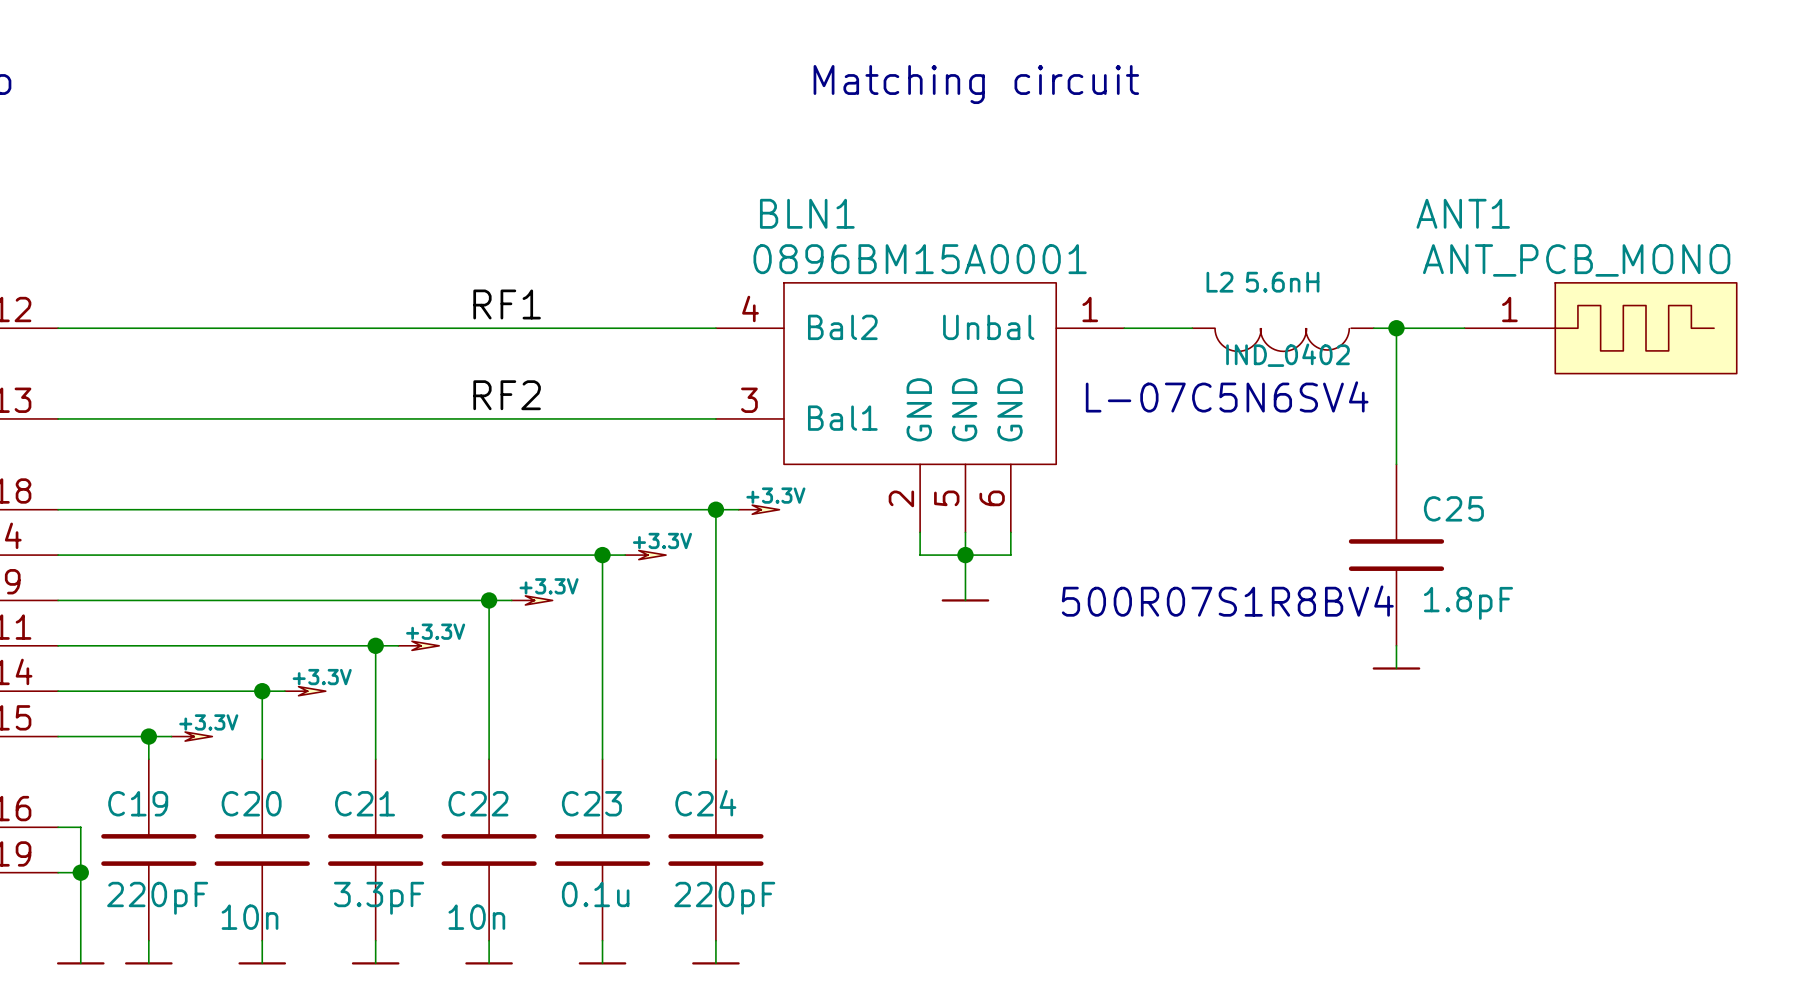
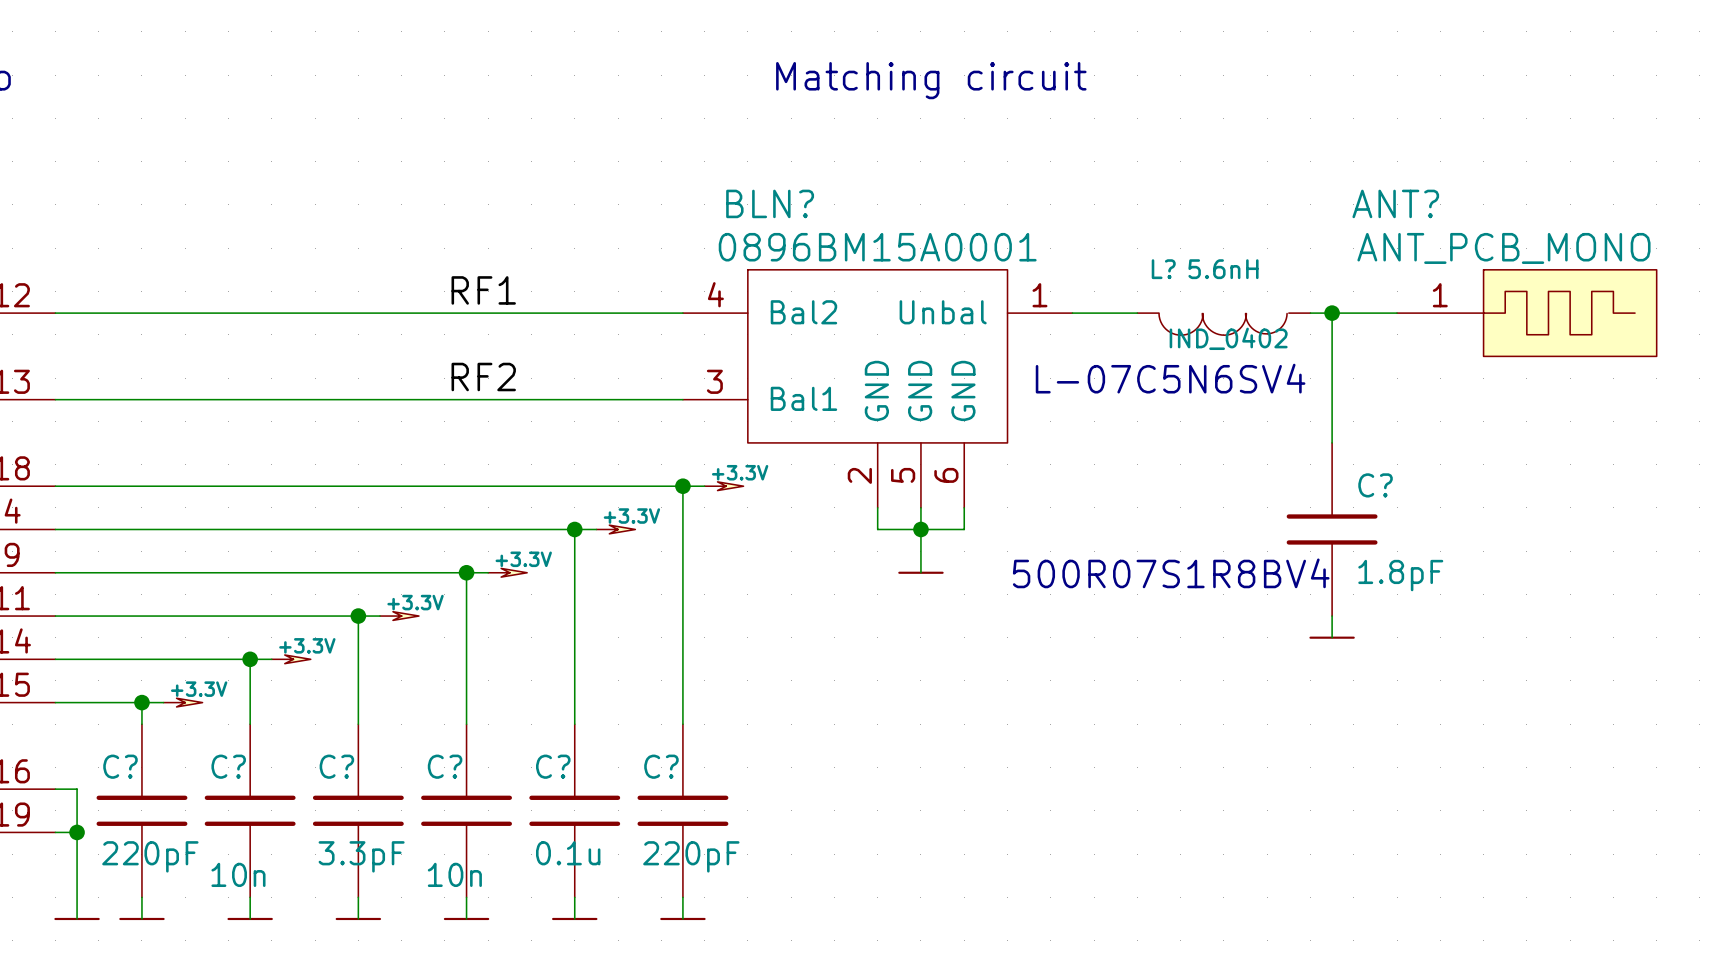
BLN1 name: BLN1 (807, 213) -> BLN? (770, 203)
ANT1 name: ANT1 (1463, 213) -> ANT? (1395, 203)
L2 name: L2 (1219, 282) -> L? (1163, 269)
C25 name: C25 (1453, 508) -> C? (1375, 485)
C19 name: C19 (138, 803) -> C? (120, 766)
C20 name: C20 (251, 803) -> C? (228, 766)
C21 name: C21 (365, 803) -> C? (336, 766)
C22 name: C22 (478, 803) -> C? (445, 766)
C23 name: C23 (591, 803) -> C? (553, 766)
C24 name: C24 (705, 803) -> C? (661, 766)

